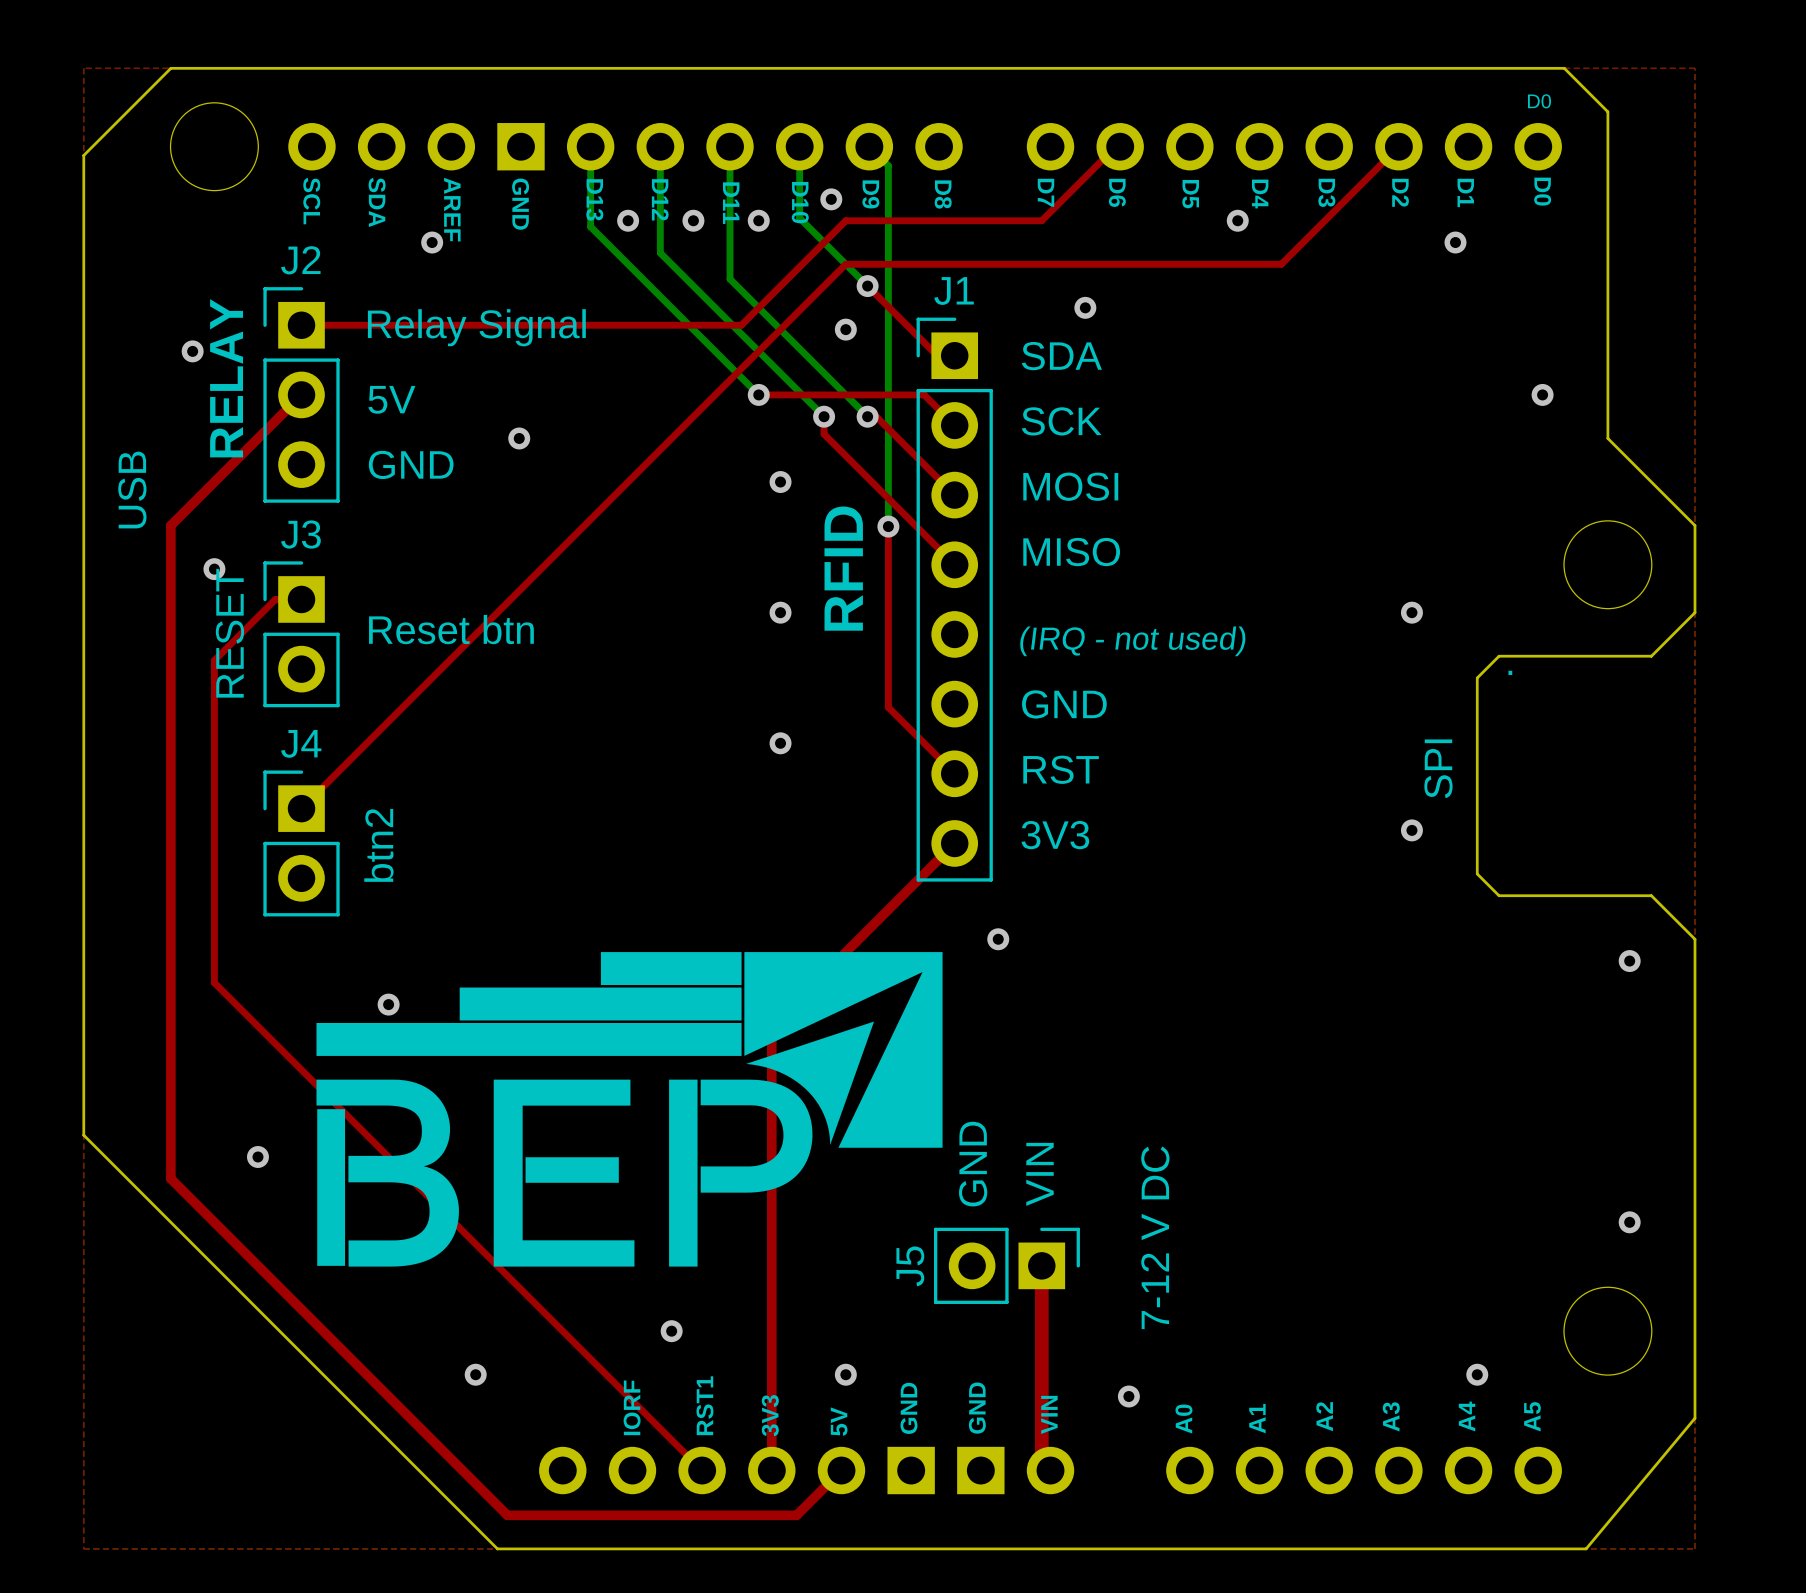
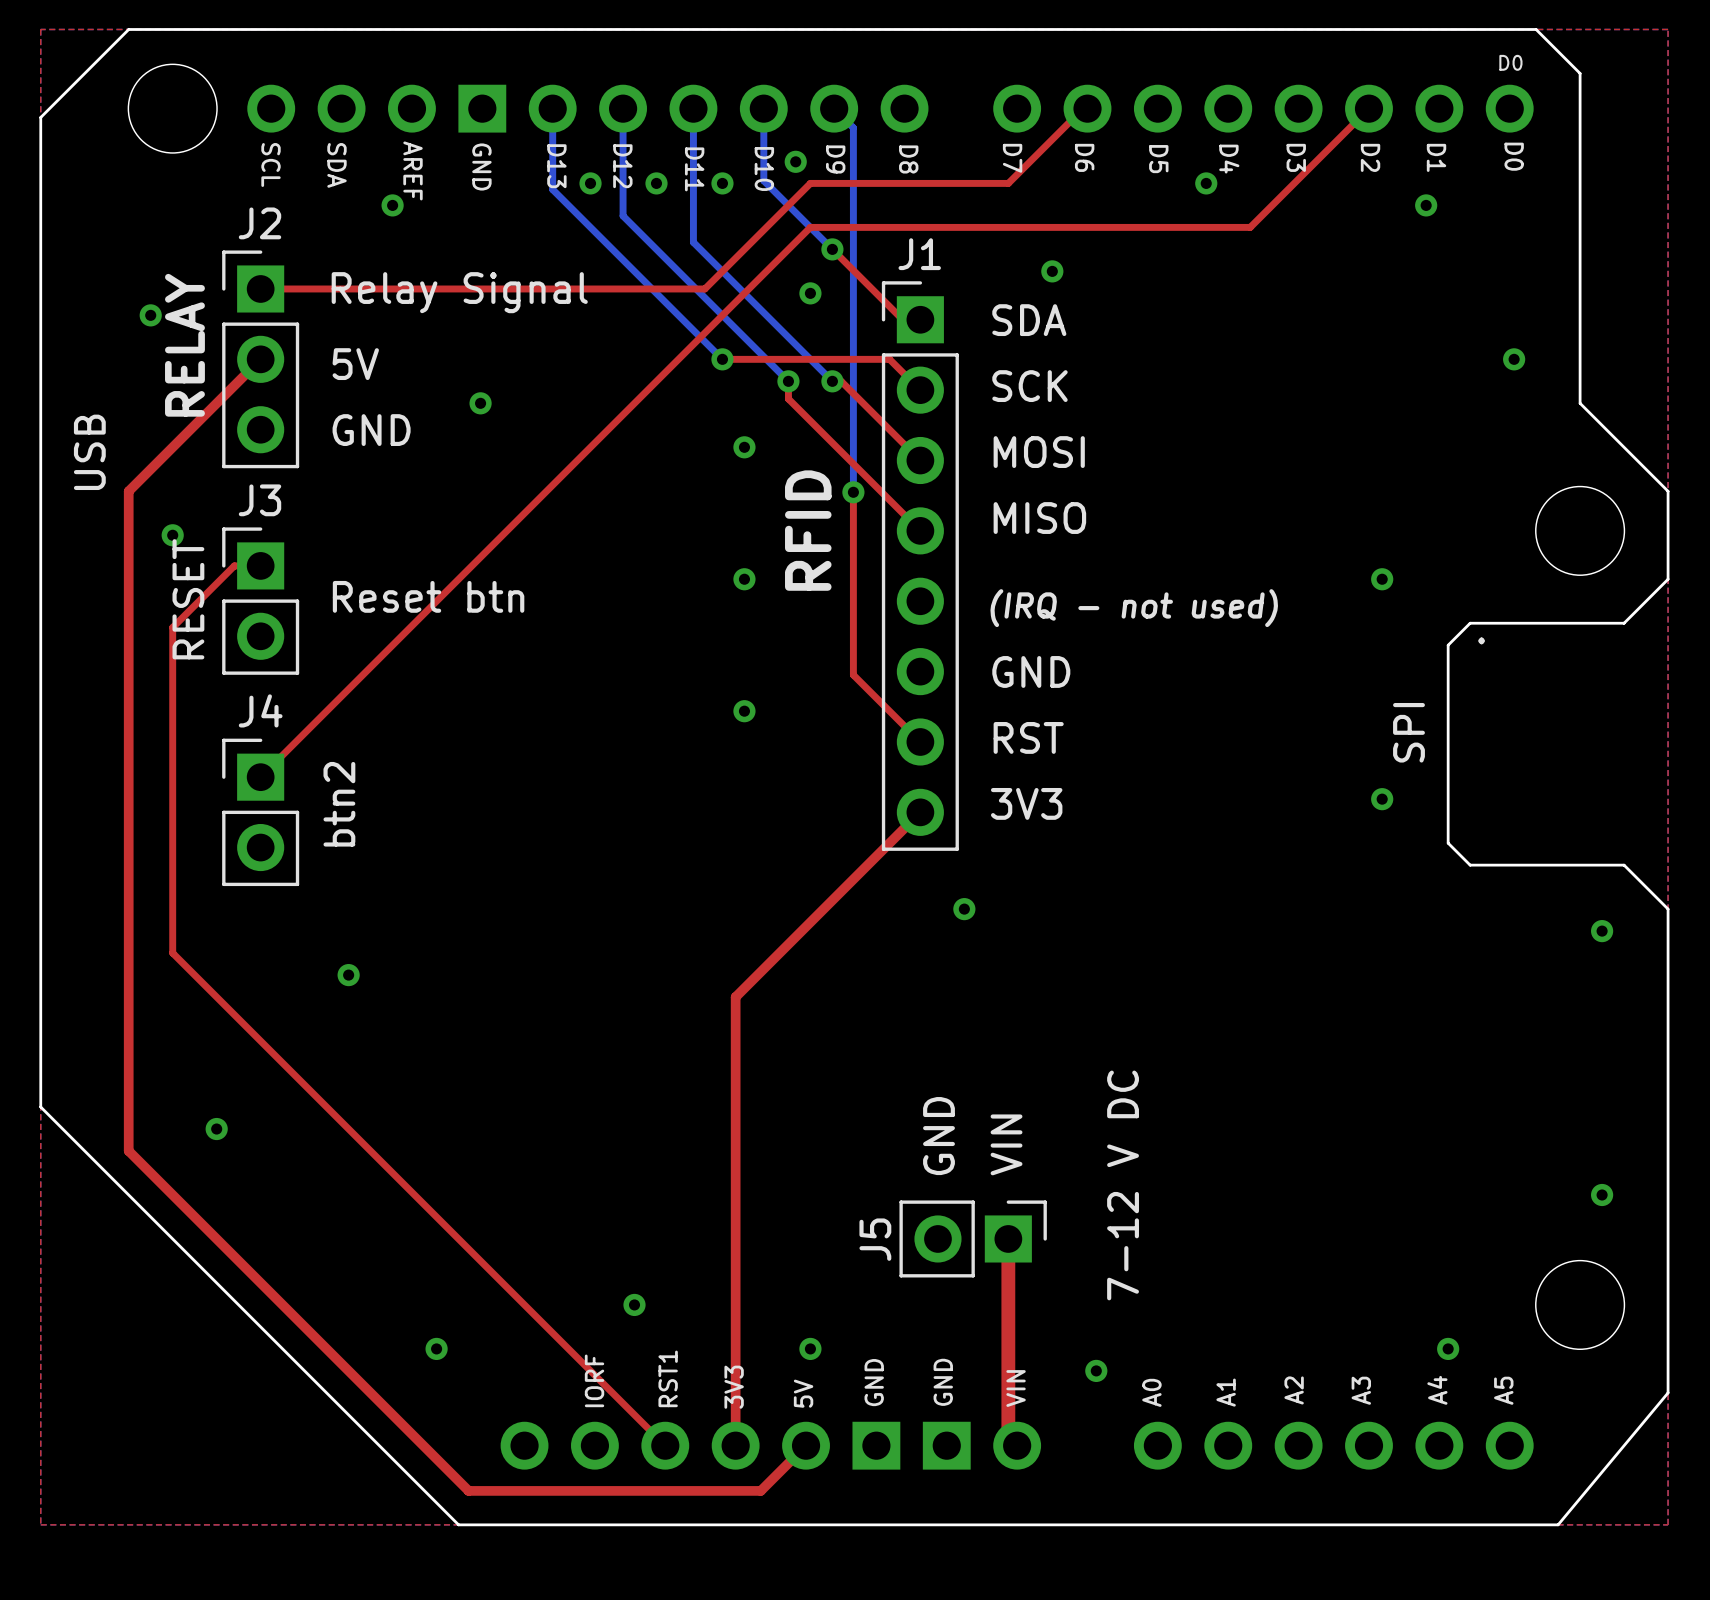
drawing: [316, 952, 943, 1267] -> none

